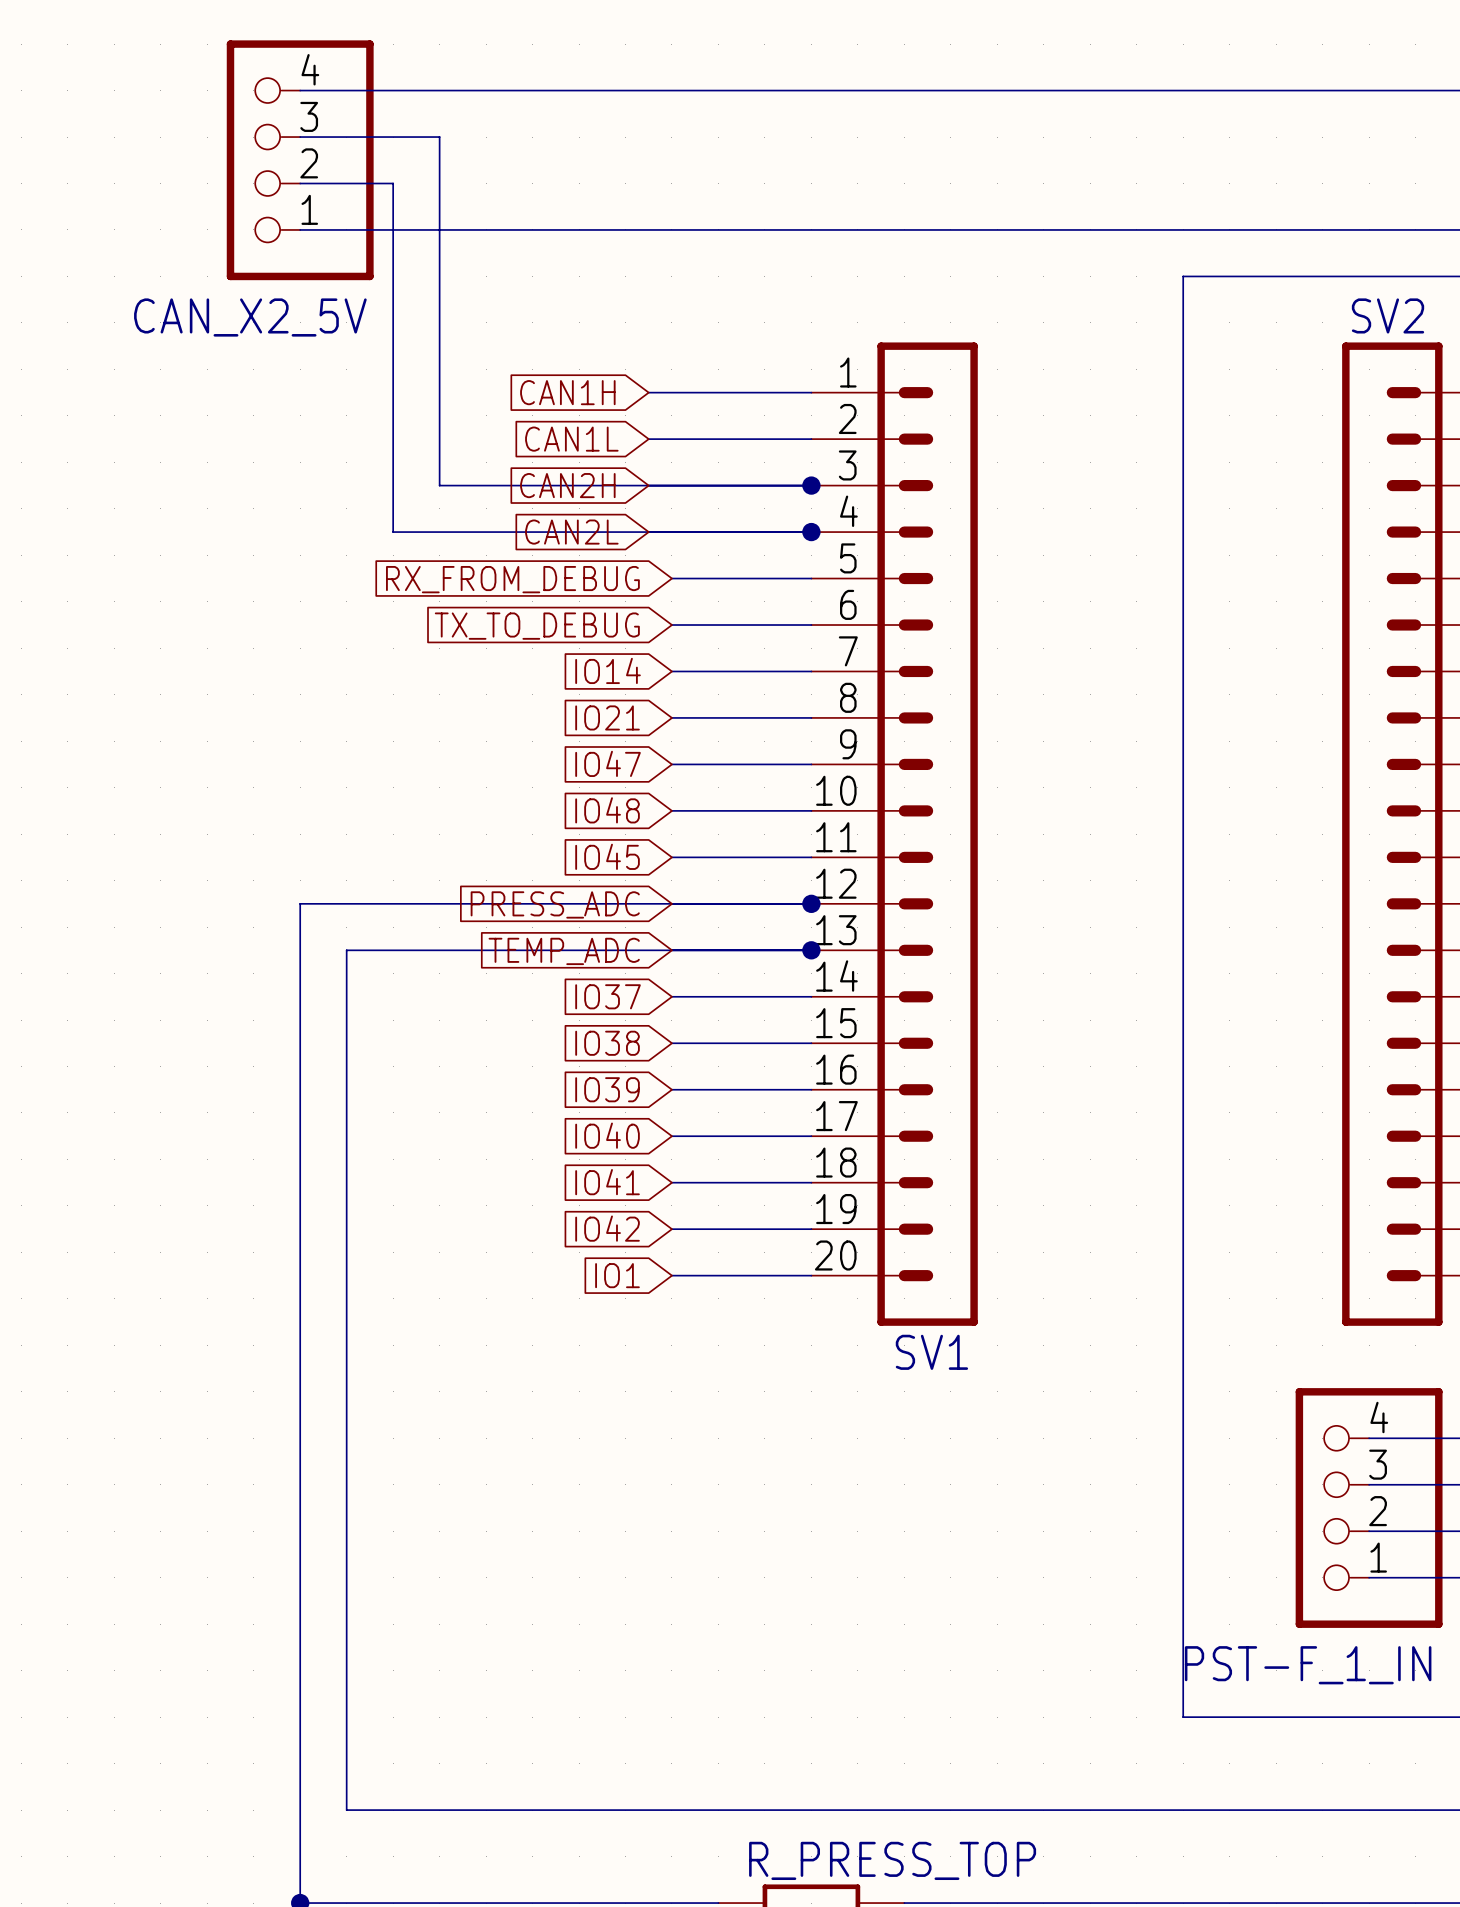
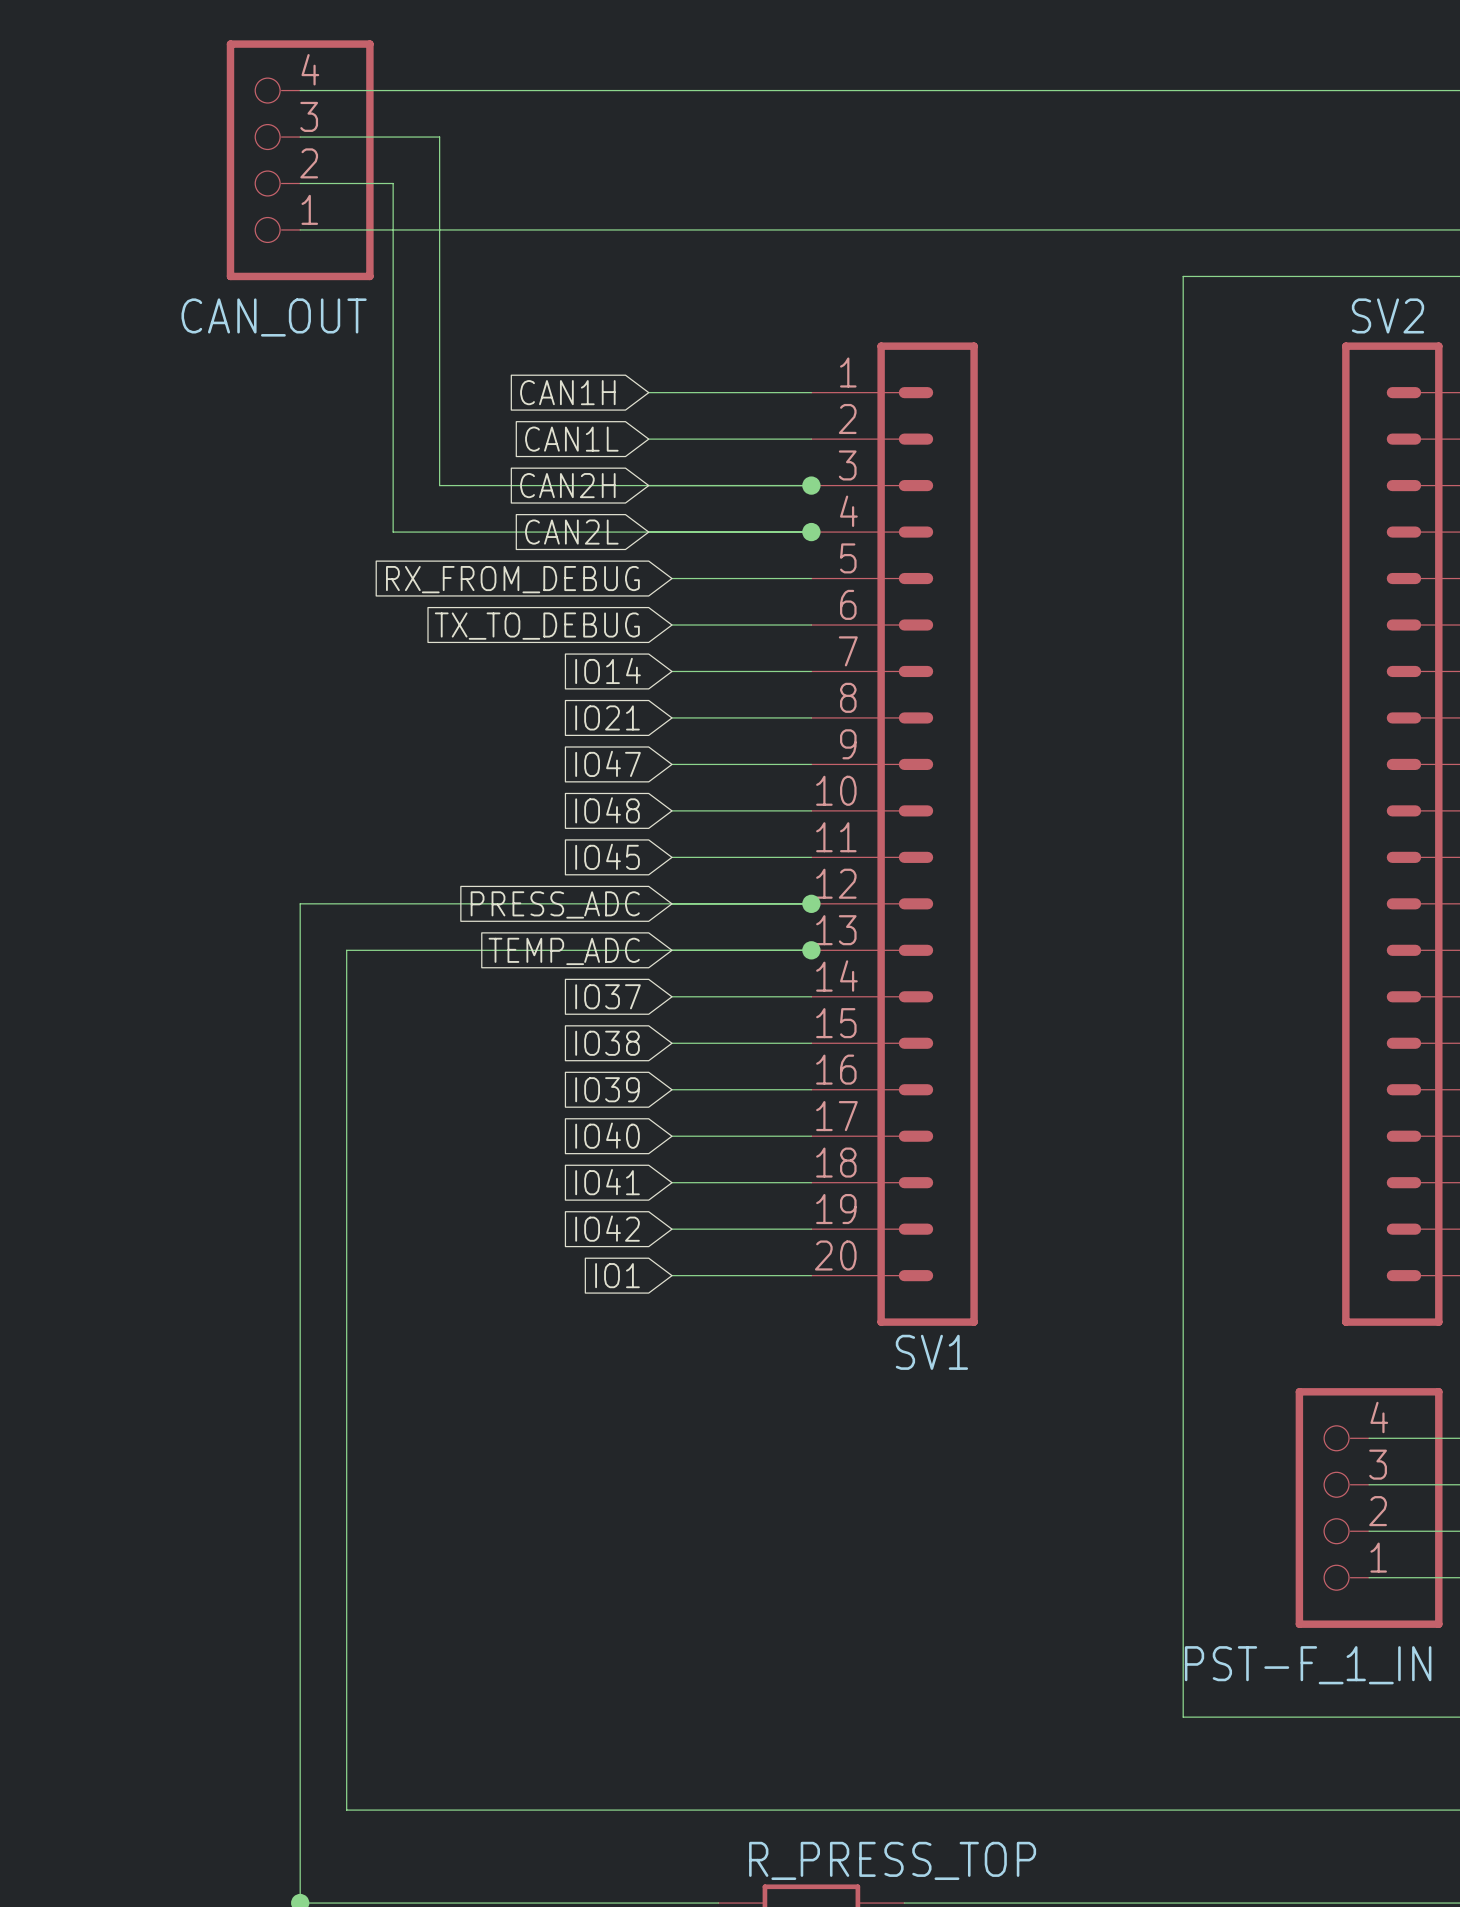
CAN_X2_5V name: CAN_X2_5V (250, 317) -> CAN_OUT (274, 317)

